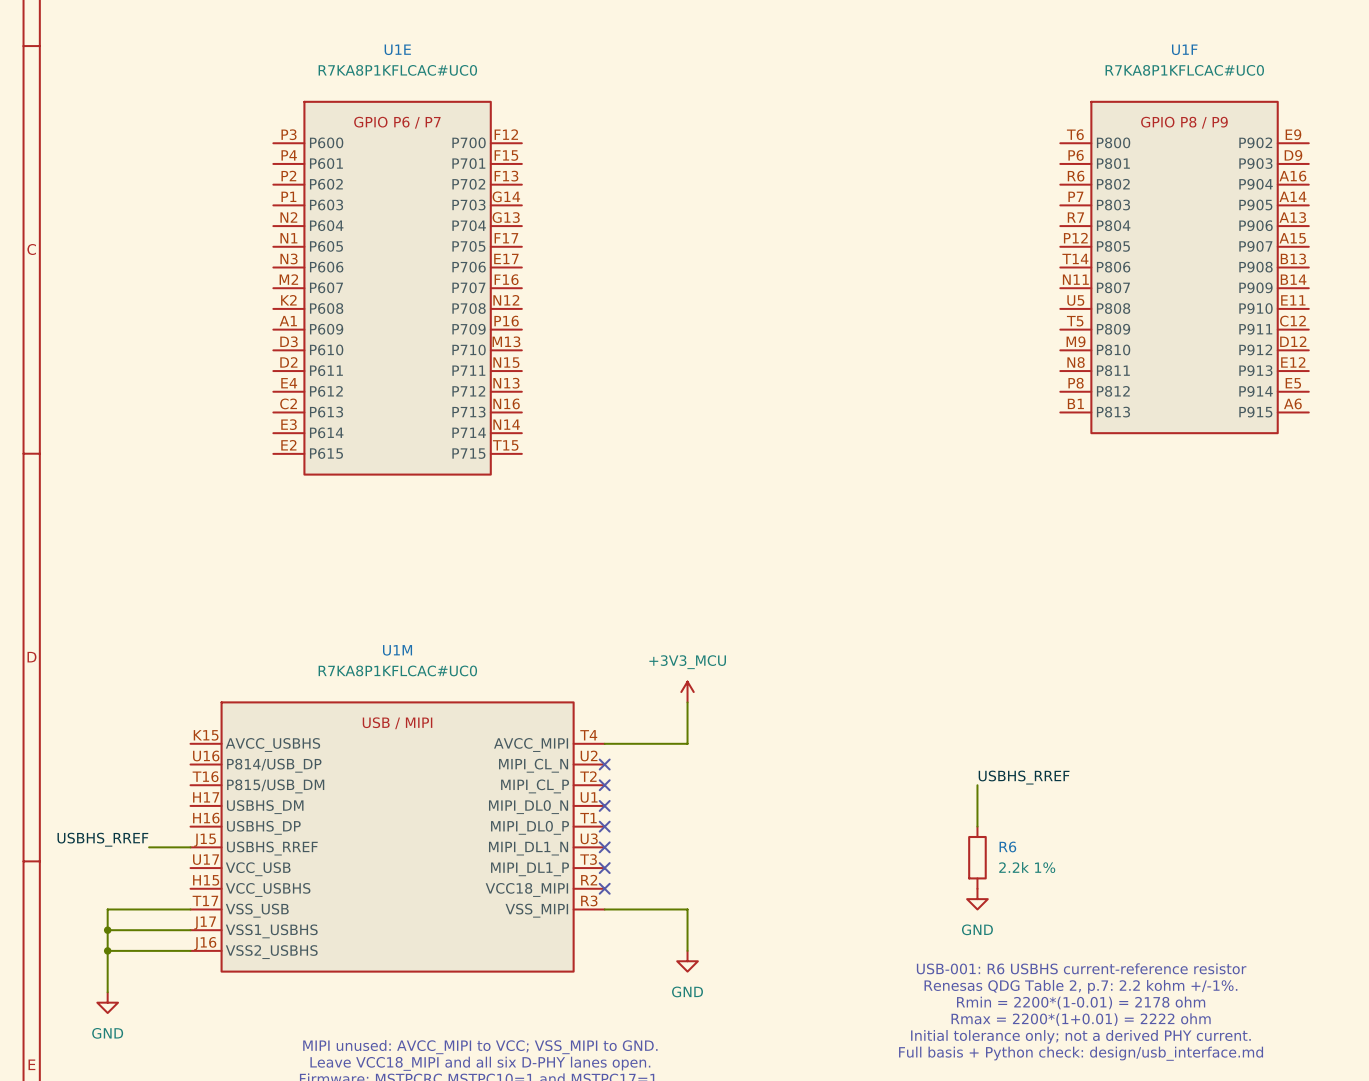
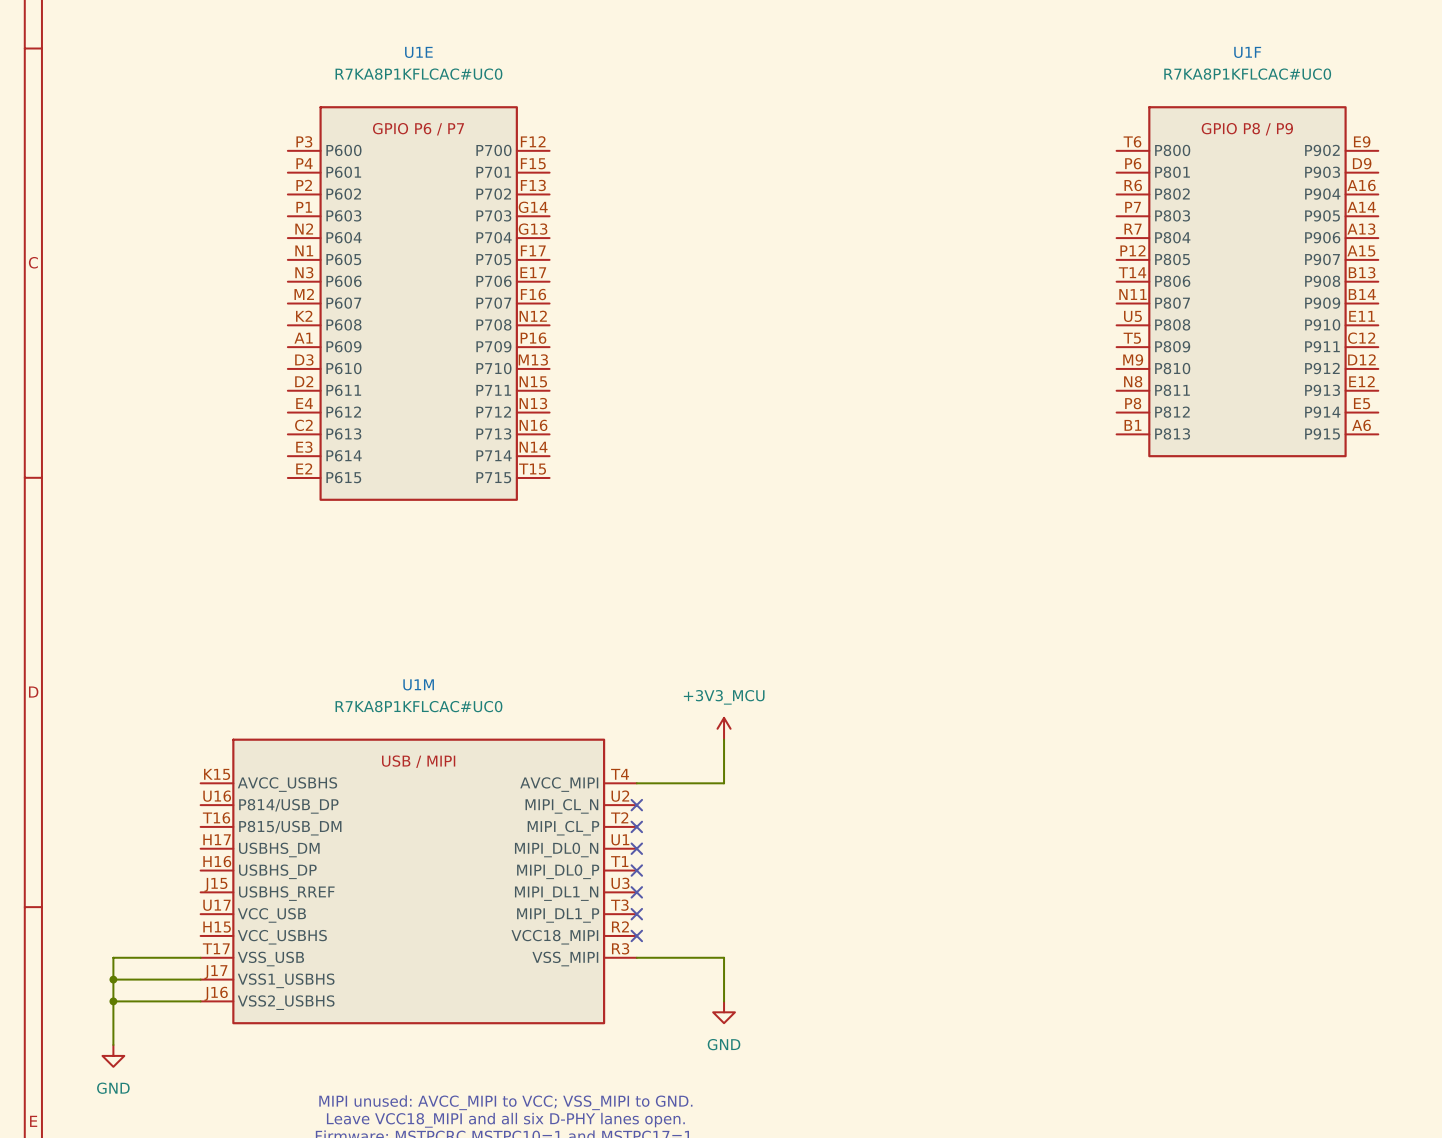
label: USBHS_RREF (1024, 777) -> none
wire: (977, 785) (977, 826) -> none
label: USBHS_RREF (102, 839) -> none
wire: (149, 847) (190, 847) -> none
R6: 2.2k 1% (977, 857) -> none
power symbol: GND (977, 899) -> none
text: USB-001: R6 USBHS current-reference resistor (1081, 968) -> none
text: Renesas QDG Table 2, p.7: 2.2 kohm +/-1%. (1080, 986) -> none
text: Rmin = 2200*(1-0.01) = 2178 ohm (1081, 1002) -> none
text: Rmax = 2200*(1+0.01) = 2222 ohm (1081, 1019) -> none
text: Initial tolerance only; not a derived PHY current. (1080, 1036) -> none
text: Full basis + Python check: design/usb_interface.md (1081, 1053) -> none

